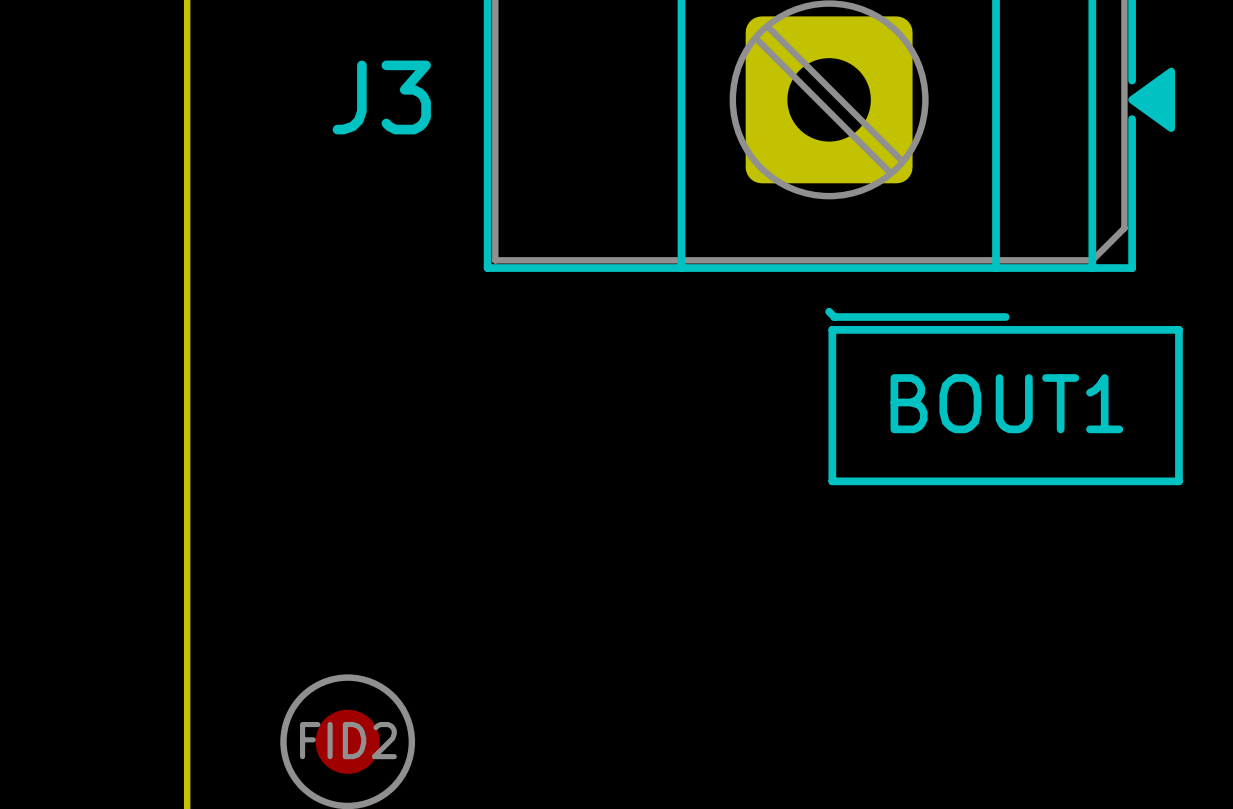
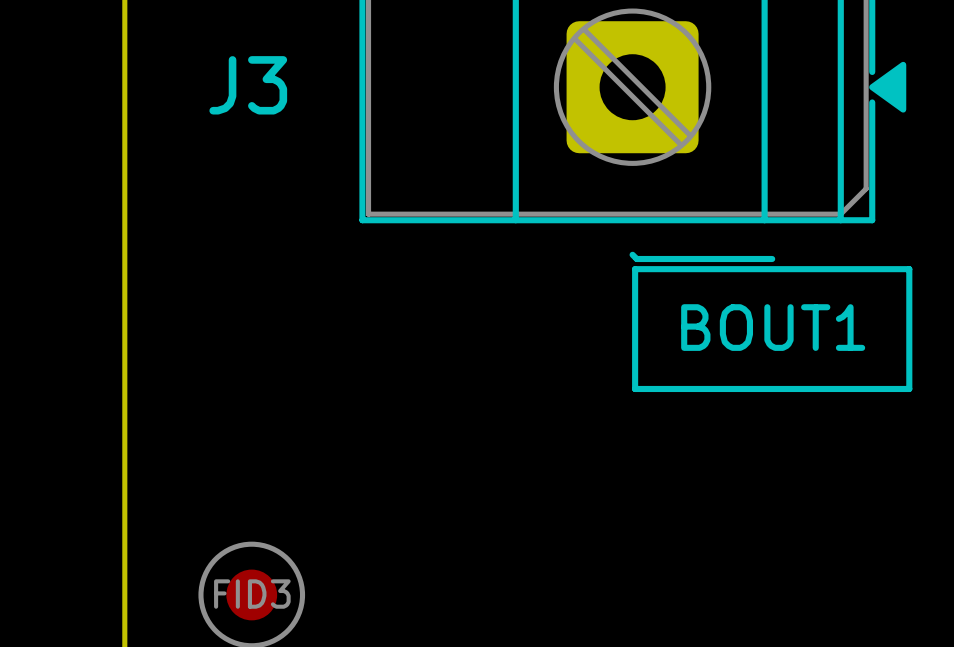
J3 name position: J3 (381, 97) -> J3 (248, 85)
FID2 name: FID2 (348, 740) -> FID3 (252, 594)

